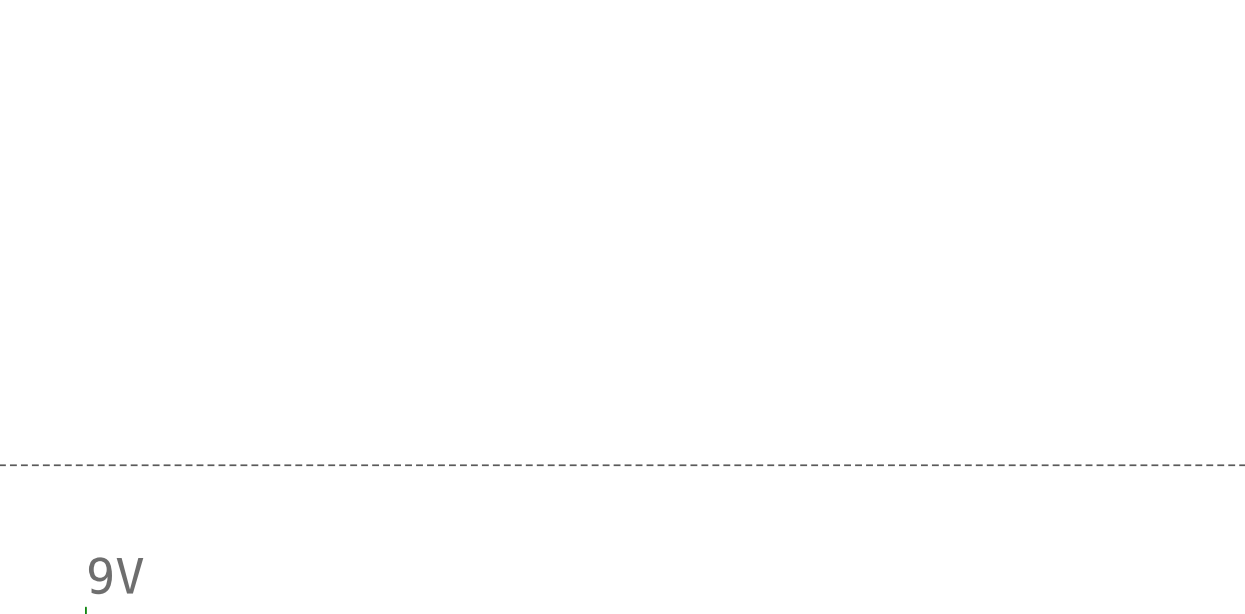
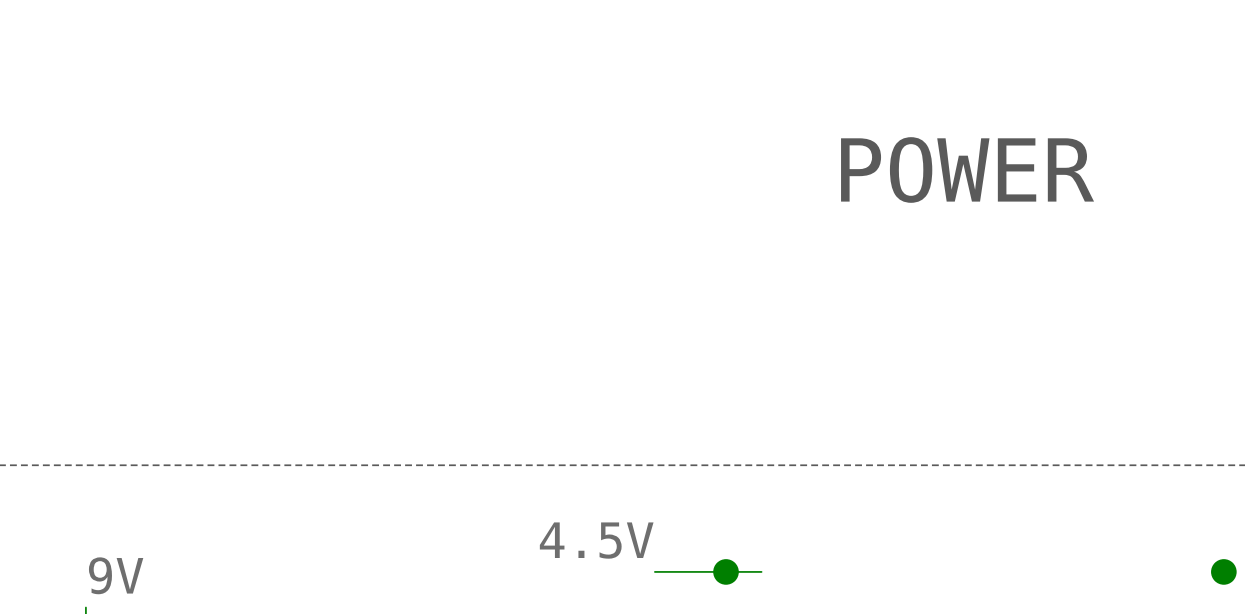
text: none -> POWER (967, 169)
label: none -> 4.5V (596, 540)
wire: none -> (654, 571) (761, 571)
junction: none -> (726, 571)
junction: none -> (1223, 571)

